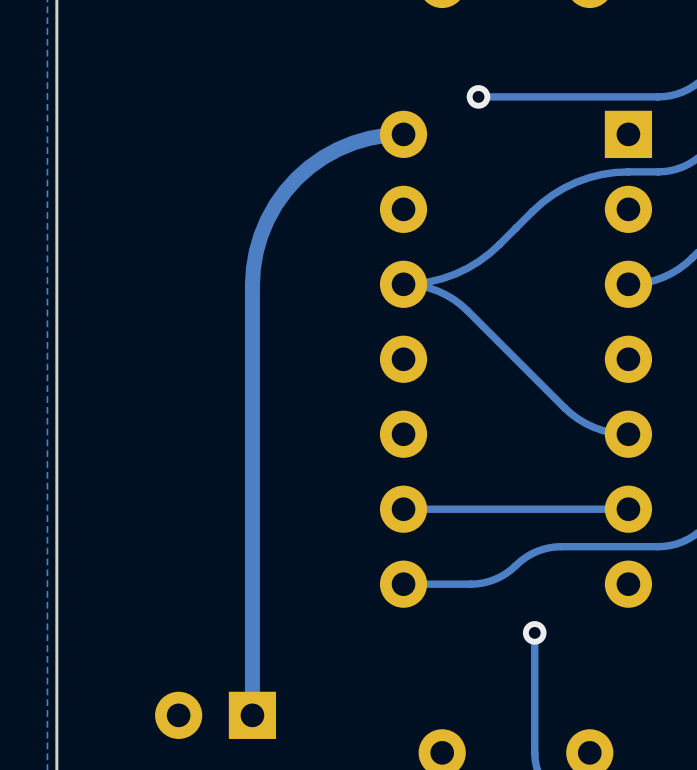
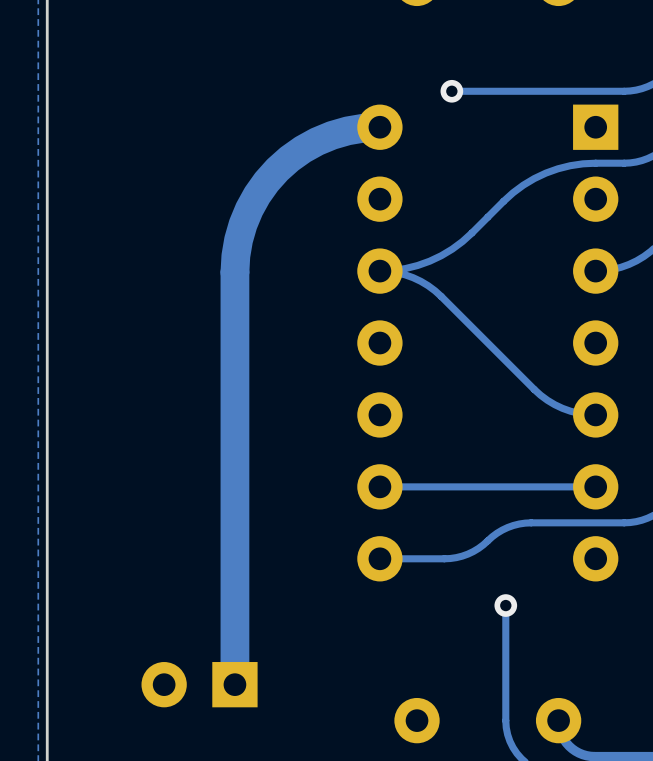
track width: thin (403, 134) (369, 138) (353, 142) (323, 157) (309, 167) (285, 191) (275, 205) (267, 219) (256, 251) (252, 285) (252, 715) -> thick (379, 127) (347, 130) (332, 135) (302, 149) (289, 158) (266, 181) (257, 195) (249, 209) (238, 239) (234, 272) (234, 684)

